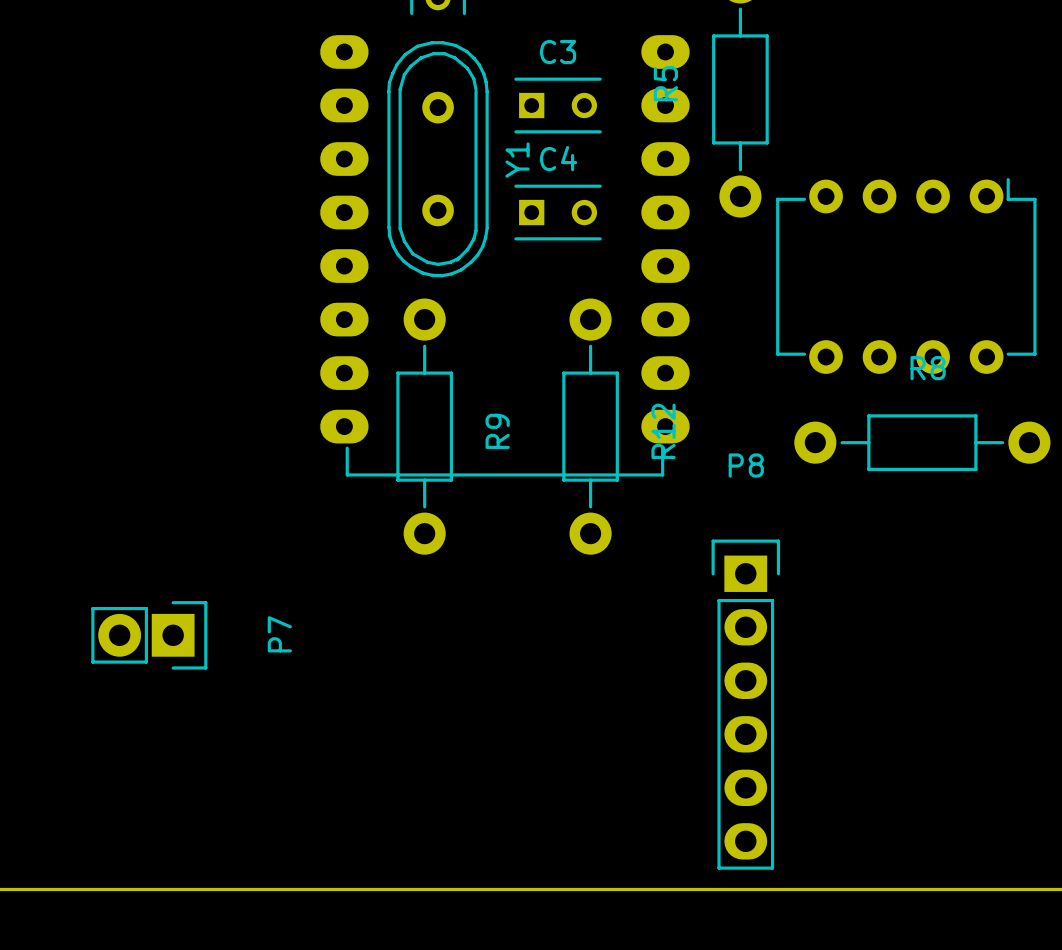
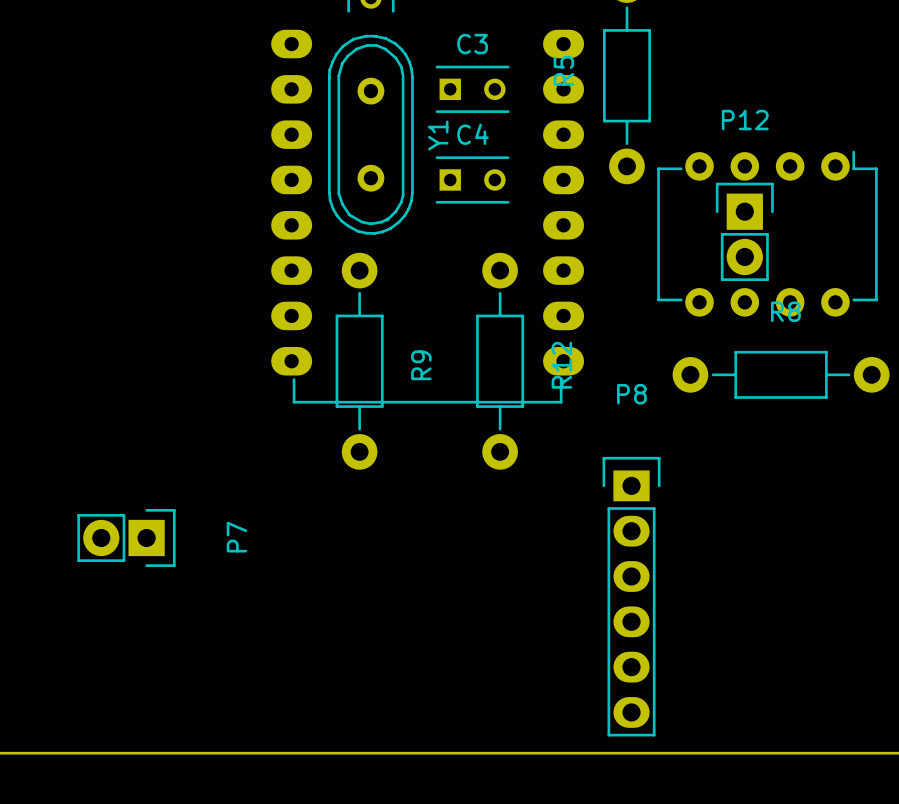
P12: none -> (744, 231)

